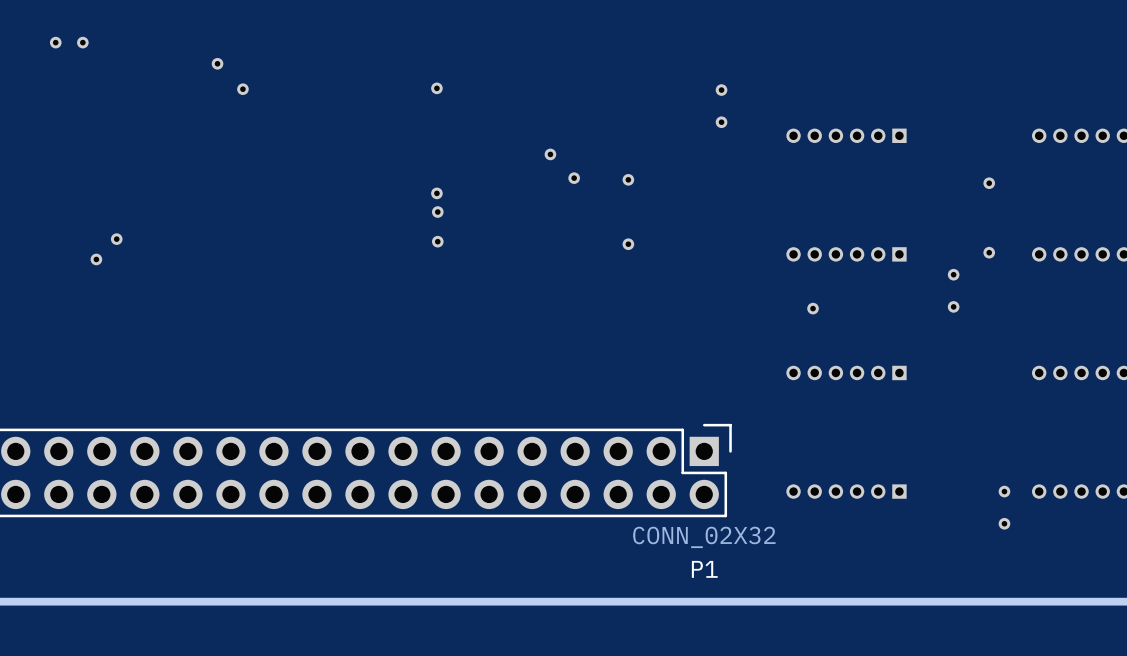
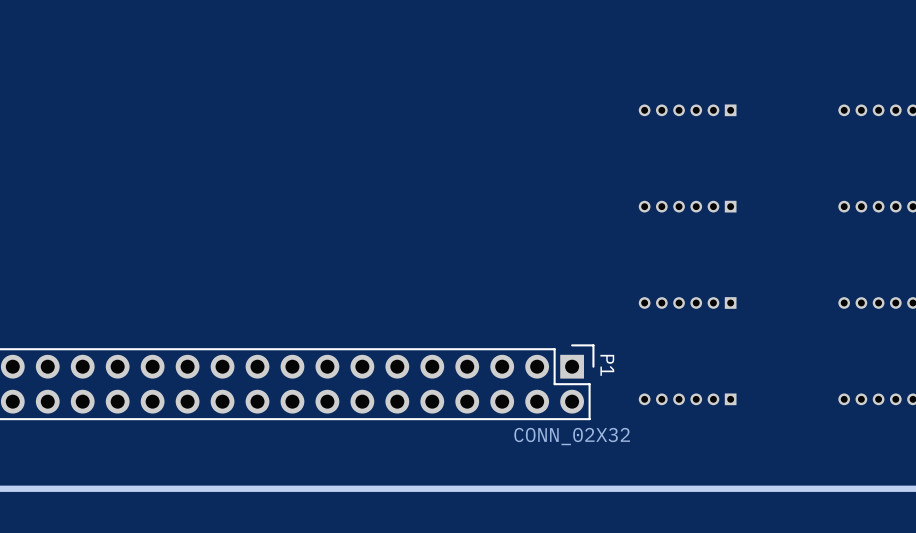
part: (55, 42) -> none
part: (82, 42) -> none
part: (217, 63) -> none
part: (436, 88) -> none
part: (242, 89) -> none
part: (721, 90) -> none
part: (721, 122) -> none
part: (550, 154) -> none
part: (574, 178) -> none
part: (628, 179) -> none
part: (989, 183) -> none
part: (436, 193) -> none
part: (437, 212) -> none
part: (116, 239) -> none
part: (437, 241) -> none
part: (628, 244) -> none
part: (989, 252) -> none
part: (96, 259) -> none
part: (953, 274) -> none
part: (953, 306) -> none
part: (813, 308) -> none
part: (1004, 491) -> none
part: (1004, 523) -> none
P1 name rotation: 0° (704, 569) -> 90° clockwise (607, 365)
P1 name position: P1 (704, 569) -> P1 (607, 365)

